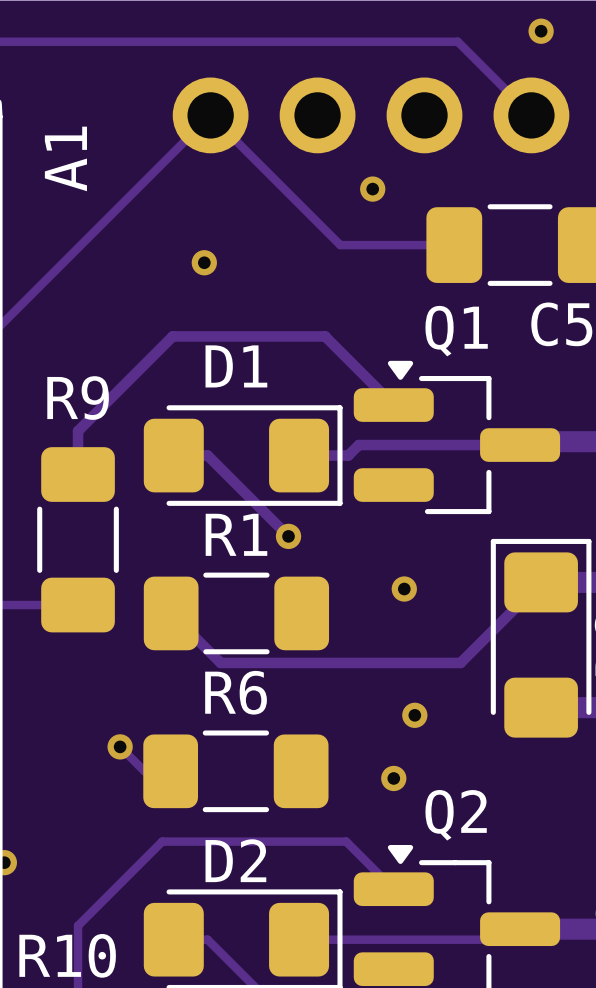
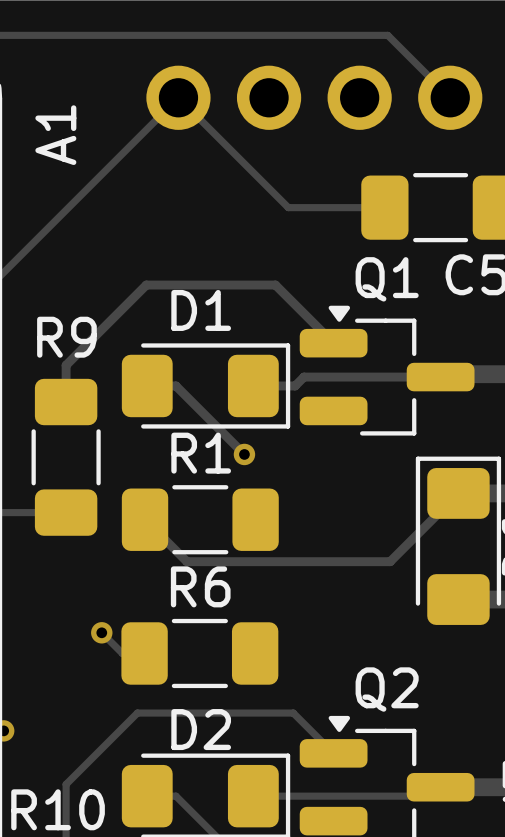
via: (541, 31) -> none
via: (372, 189) -> none
via: (204, 262) -> none
via: (404, 589) -> none
via: (414, 715) -> none
via: (393, 778) -> none

